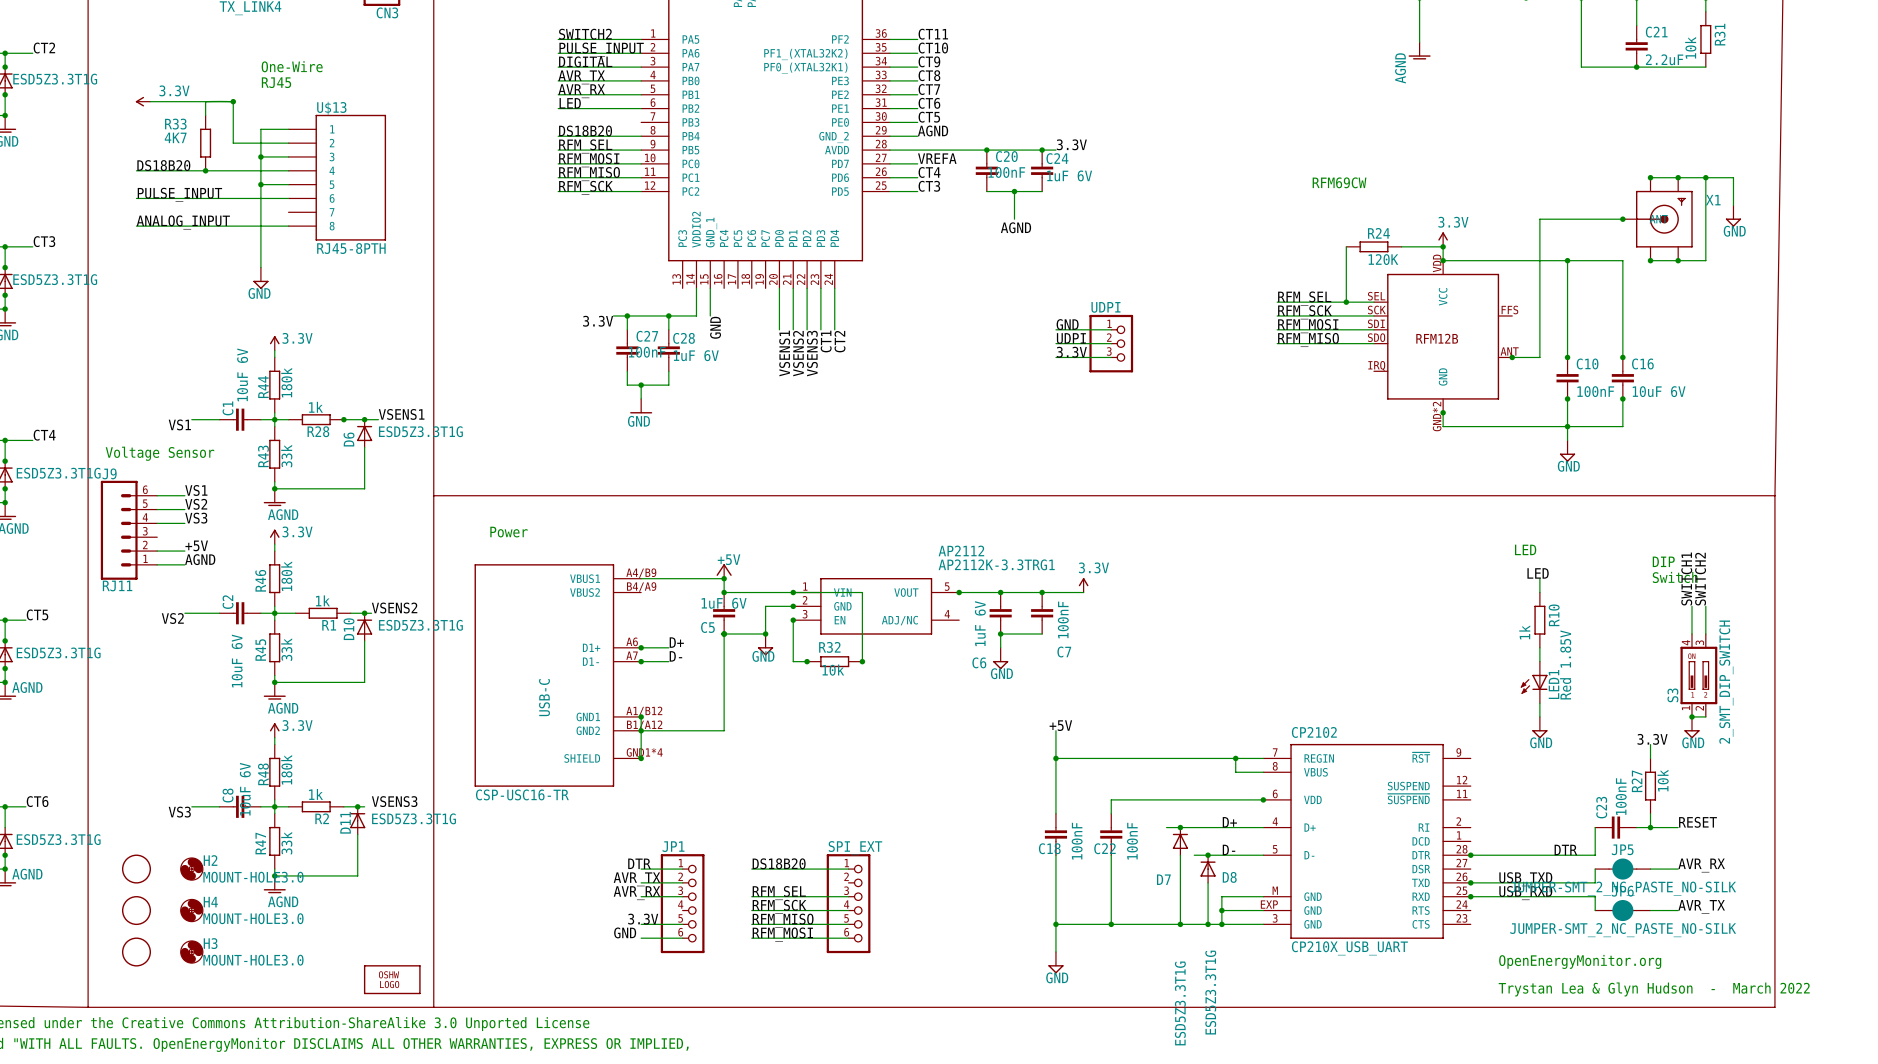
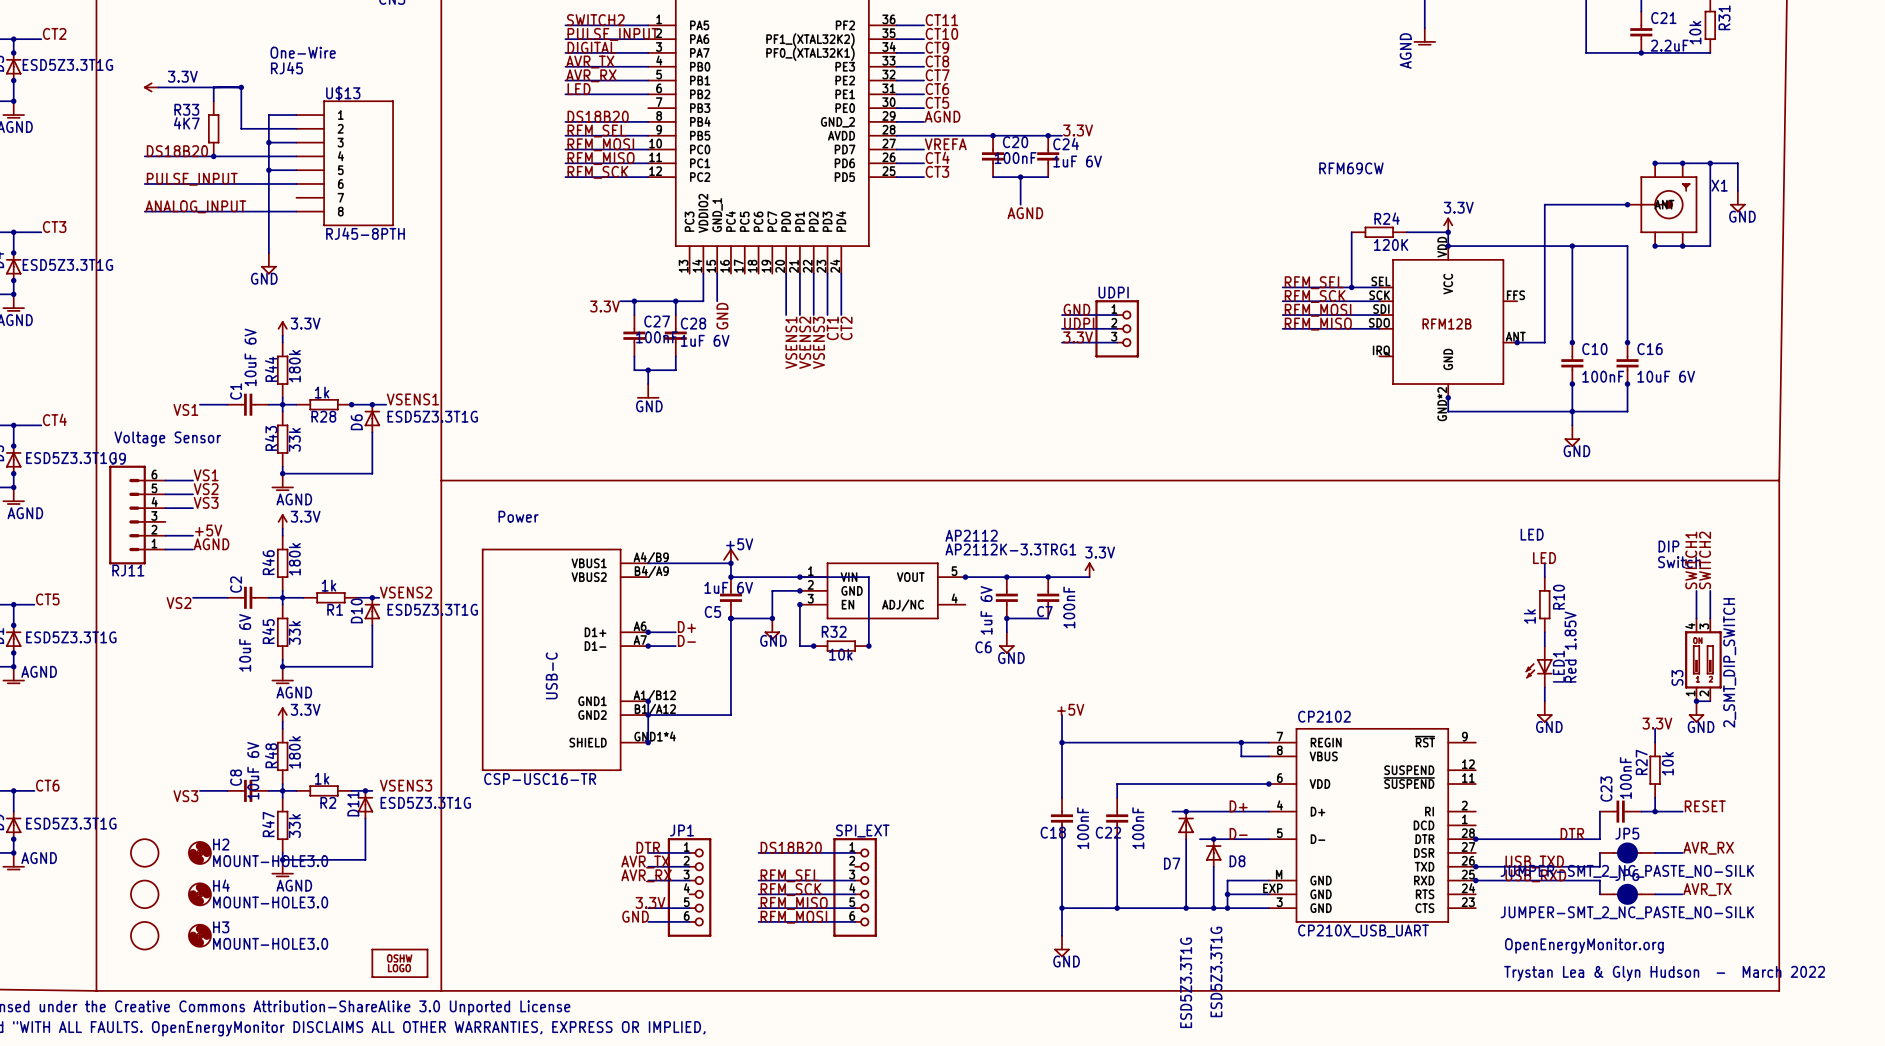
C7 name position: C7 (1064, 652) -> C7 (1044, 611)

